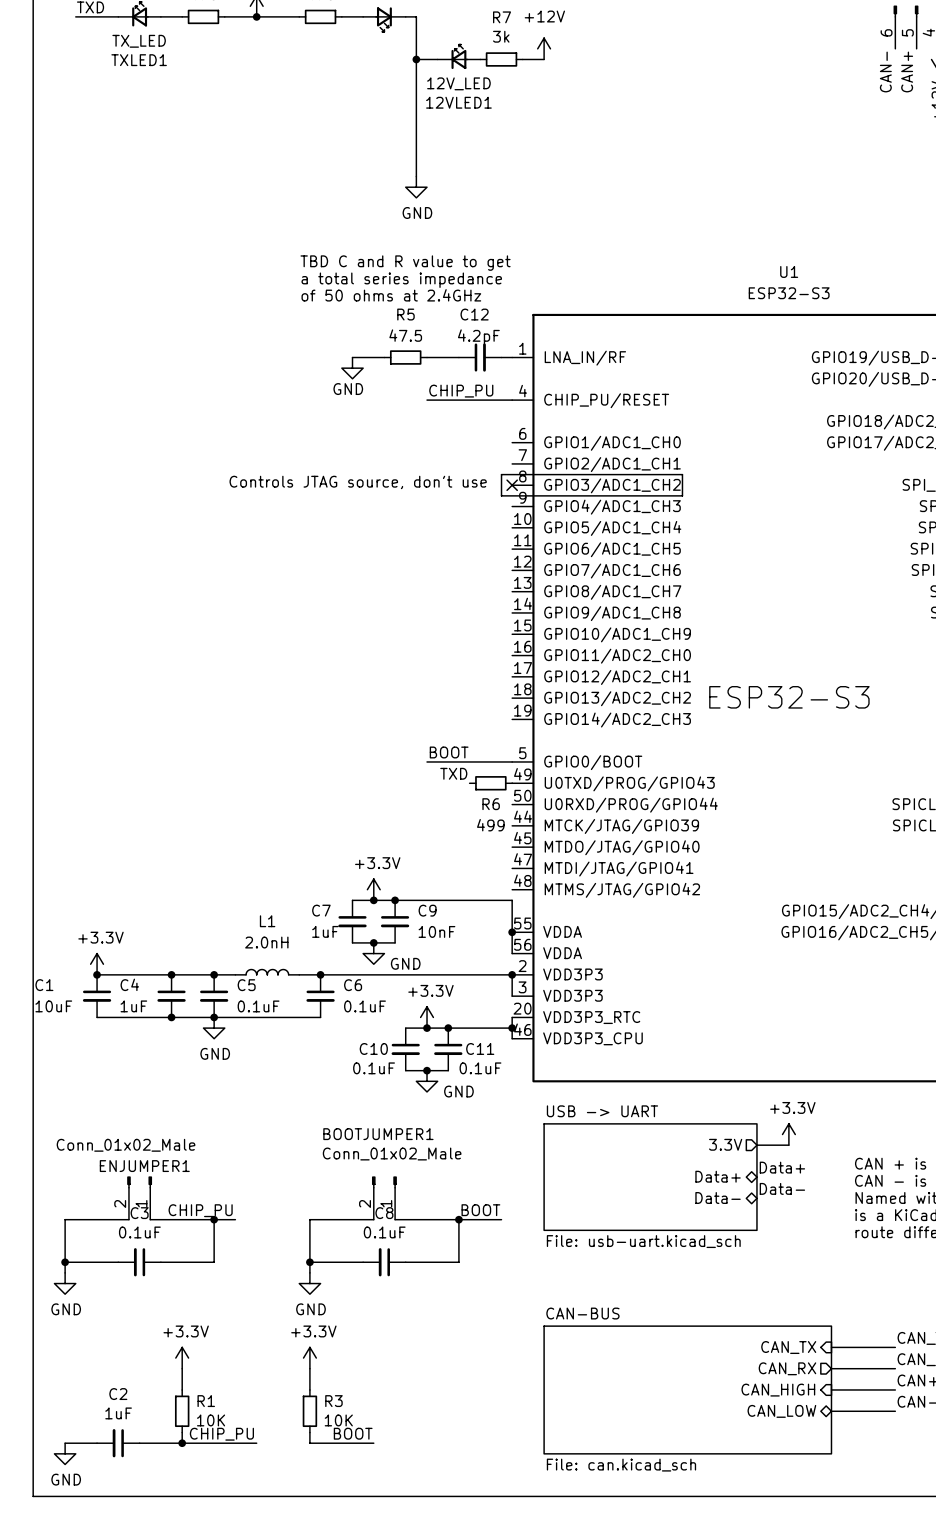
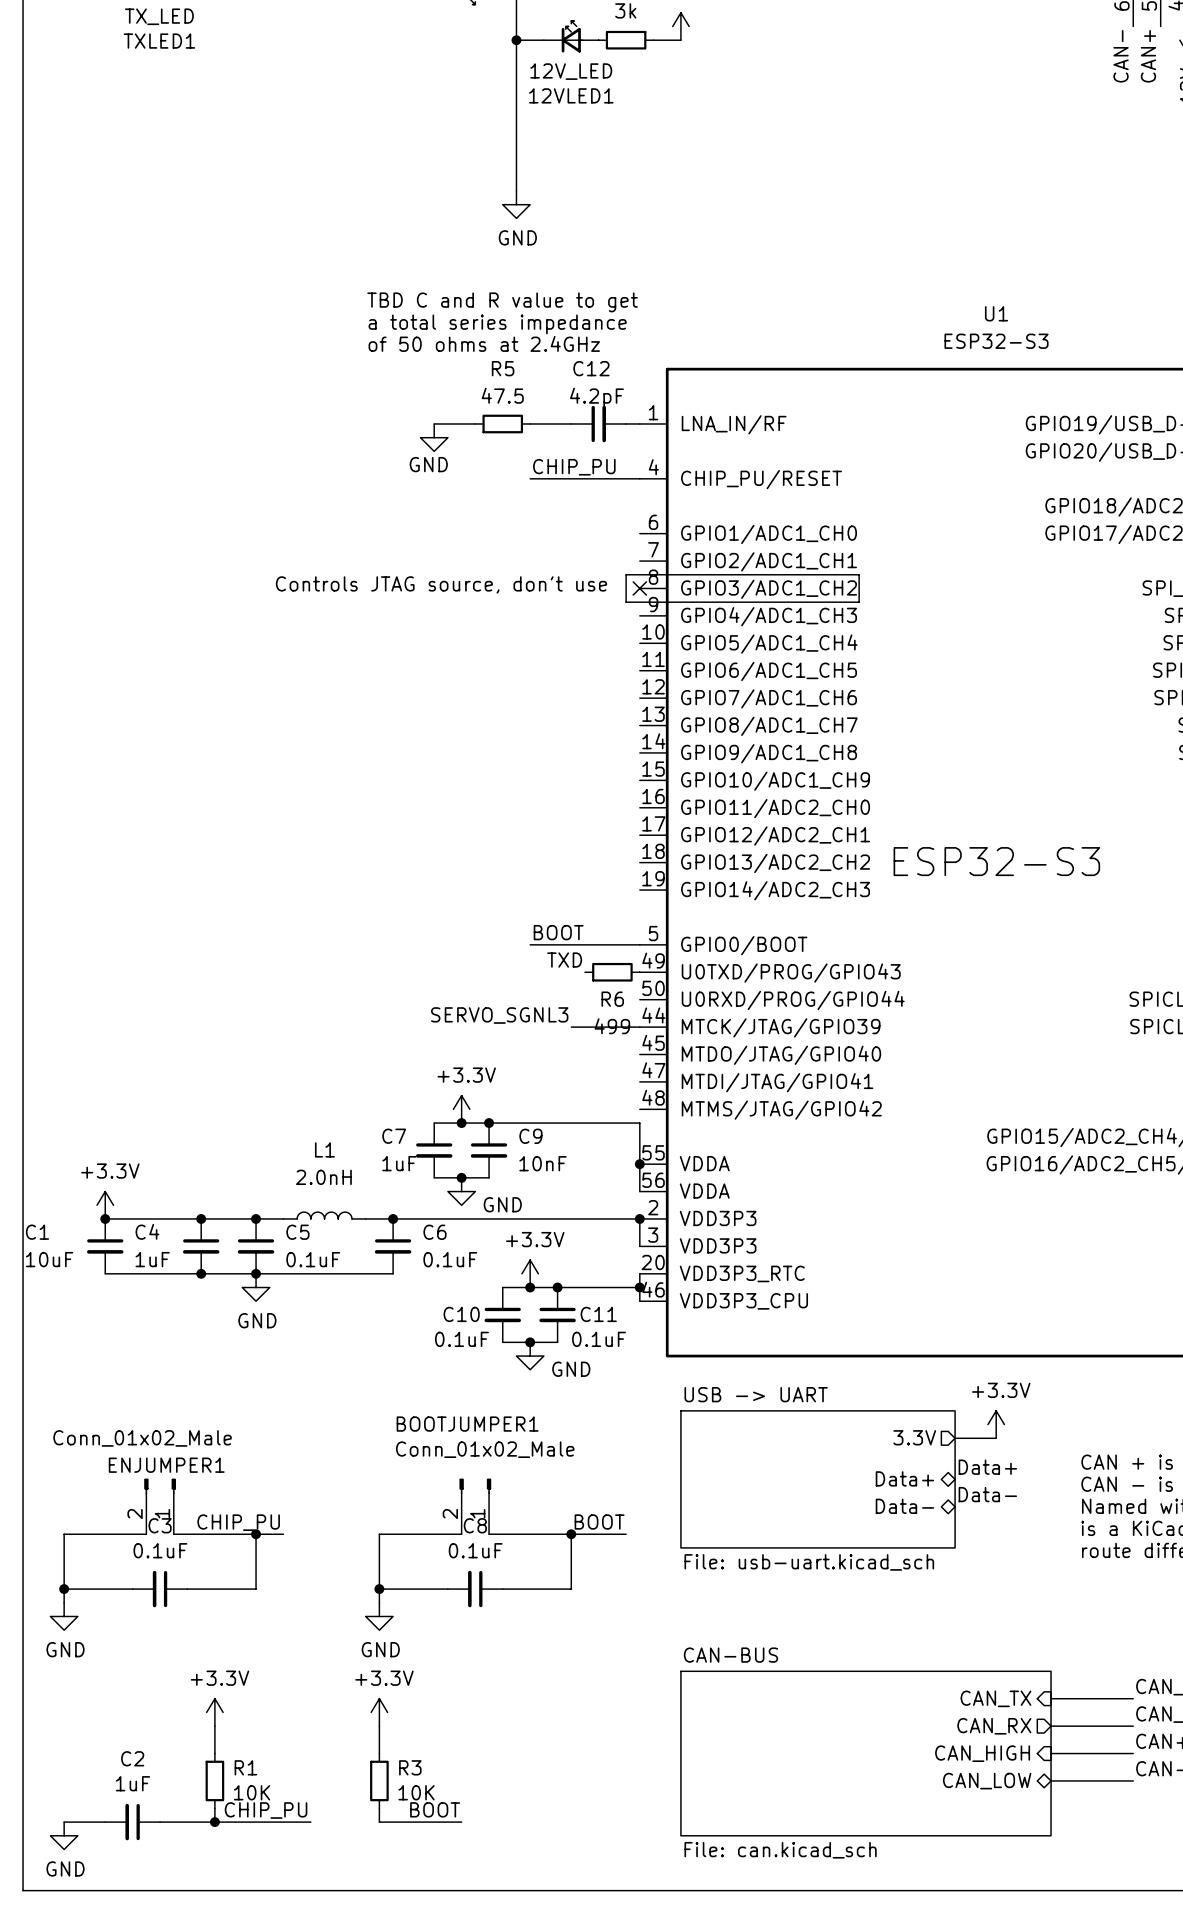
label: none -> SERVO_SGNL3 (499, 1015)
wire: none -> (571, 1027) (639, 1027)

